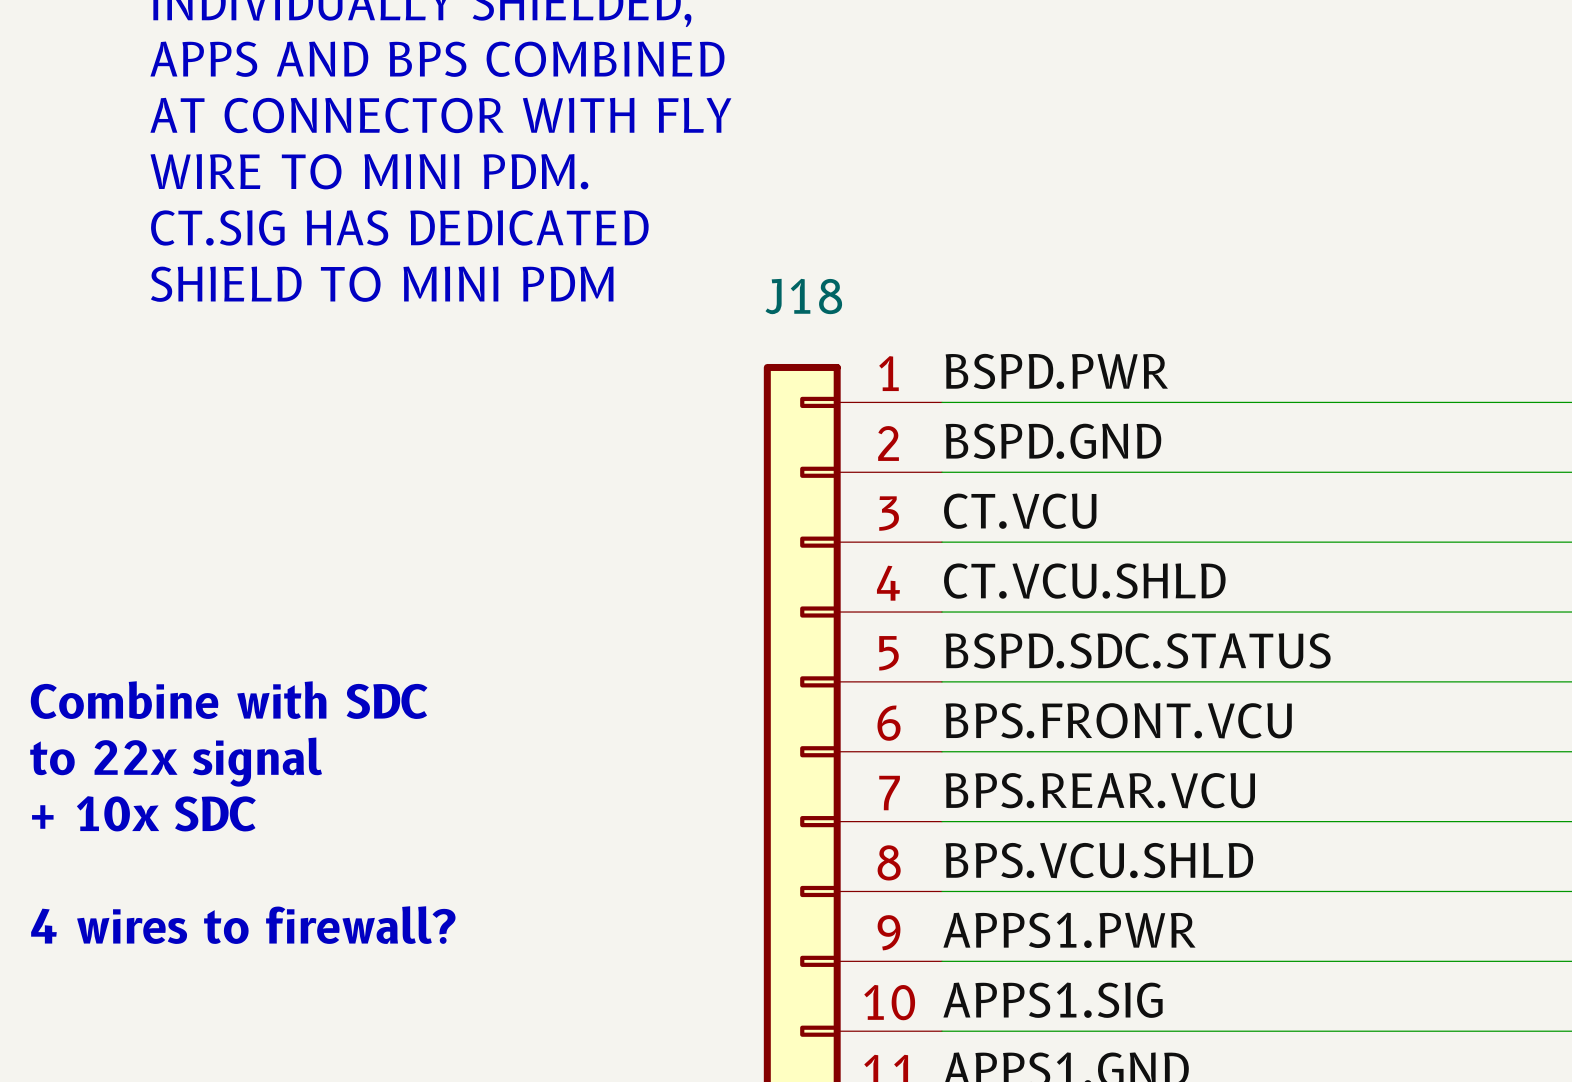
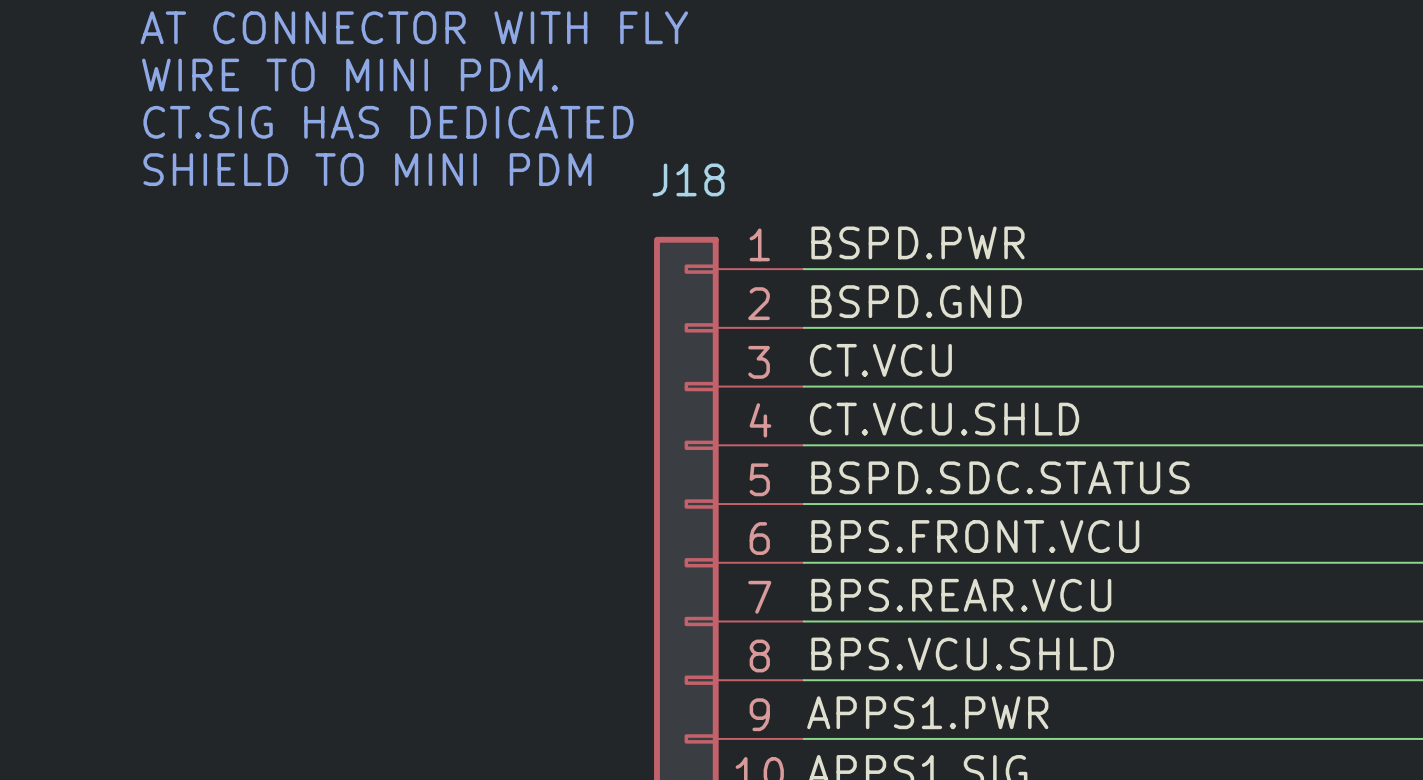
text: Combine with SDC (229, 700) -> none
text: to 22x signal (176, 762) -> none
text: + 10x SDC (143, 813) -> none
text: 4 wires to firewall? (243, 925) -> none

